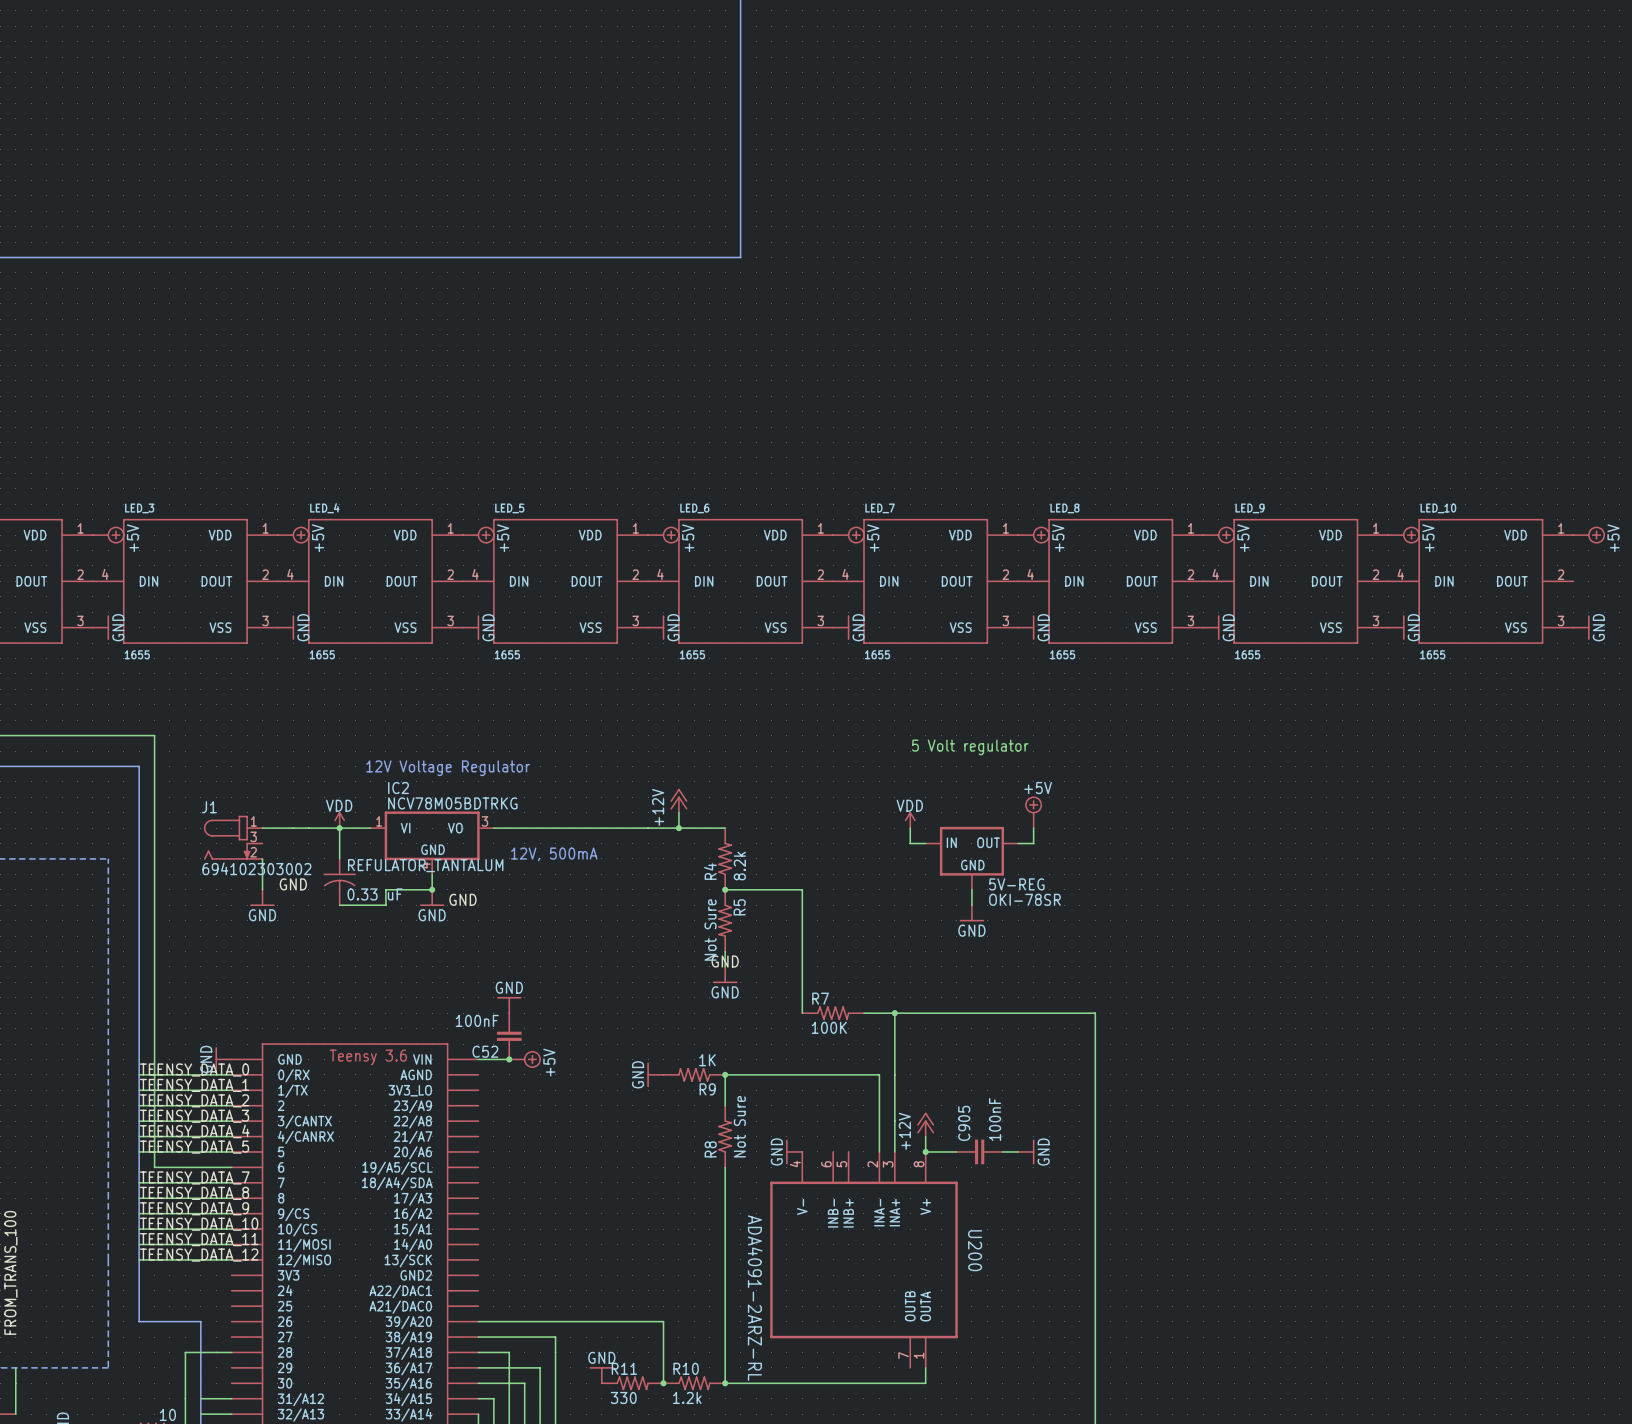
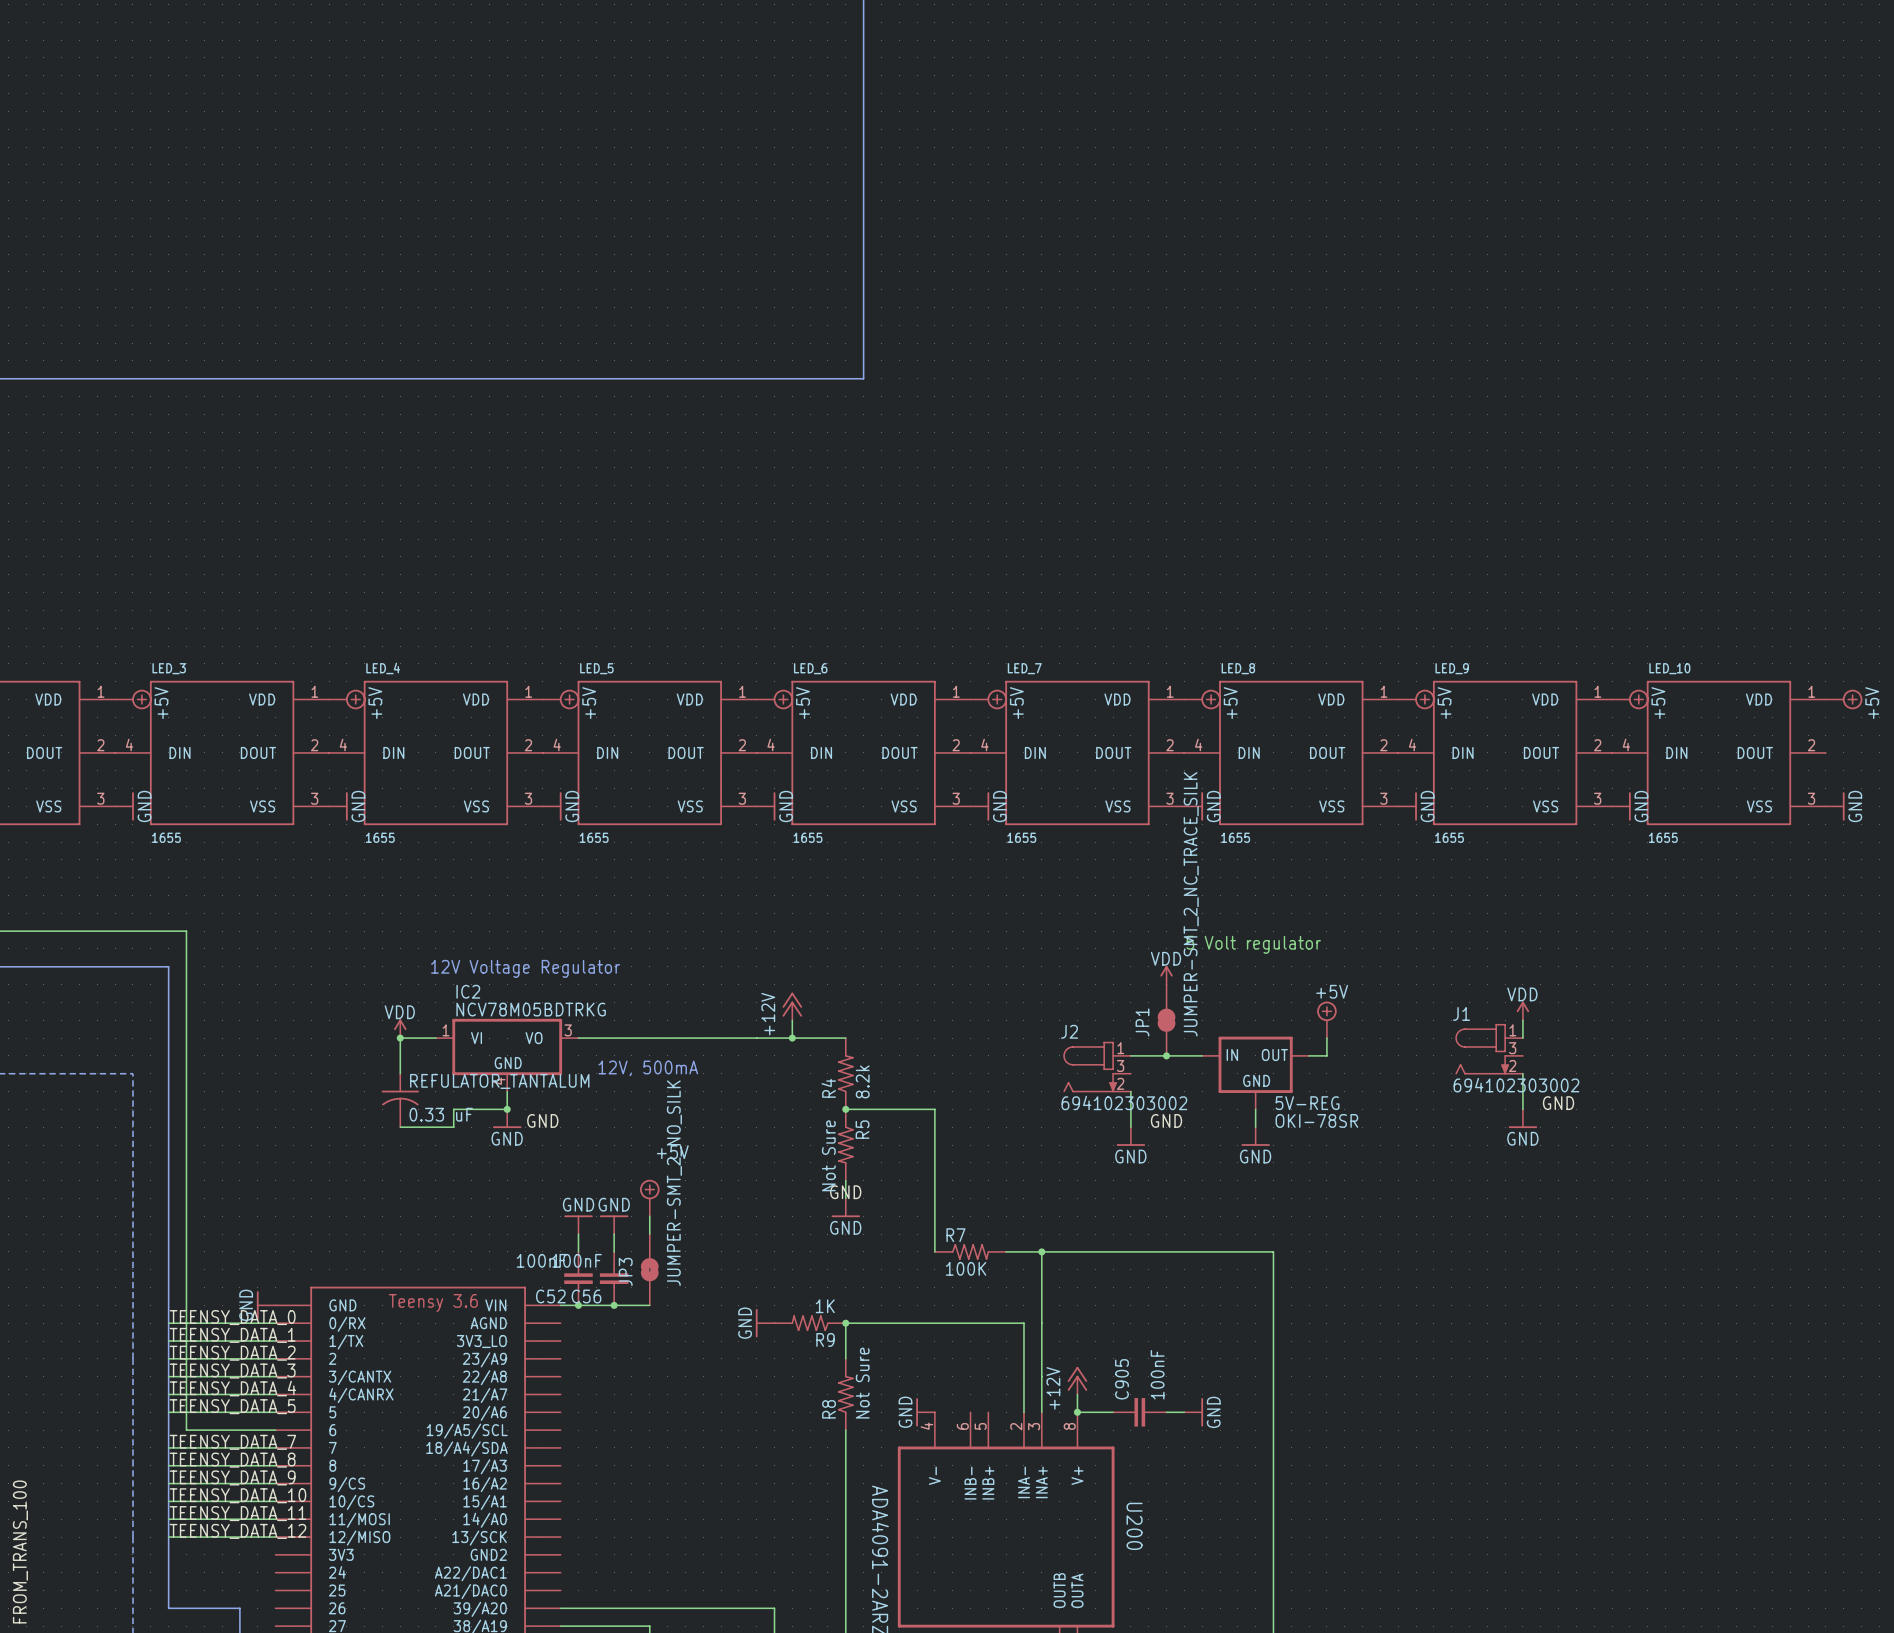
text position: 5 Volt regulator (970, 747) -> 5 Volt regulator (1253, 944)
power symbol: none -> VDD (1522, 1010)
JP1: none -> JUMPER-SMT_2_NC_TRACE_SILK (1166, 1020)
power symbol position: +5V (1033, 812) -> +5V (1326, 1019)
wire: none -> (1522, 1020) (1522, 1038)
power symbol position: VDD (910, 820) -> VDD (1166, 975)
wire: (262, 828) (339, 828) -> none
wire: (910, 828) (910, 843) (925, 843) -> none
wire: (1033, 828) (1033, 843) -> (1255, 1109) (1255, 1127)
wire: none -> (1326, 1038) (1326, 1055) (1309, 1055)
J1 position: (233, 837) -> (1489, 1049)
junction: none -> (1166, 1055)
J2: none -> 694102303002 (1097, 1067)
wire: (262, 858) (262, 889) -> none
5V-REG position: (971, 858) -> (1255, 1073)
wire: none -> (1522, 1073) (1522, 1109)
label: GND (293, 884) -> none
label: none -> GND (1558, 1103)
power symbol: GND (262, 897) -> none
power symbol: none -> GND (1522, 1118)
label: none -> GND (1166, 1120)
power symbol: none -> GND (1255, 1136)
wire: none -> (649, 1216) (649, 1234)
power symbol: none -> GND (578, 1224)
power symbol: none -> GND (614, 1224)
wire: none -> (578, 1234) (578, 1251)
wire: none -> (614, 1234) (614, 1251)
power symbol: GND (509, 1005) -> none
JP3: none -> JUMPER-SMT_2_NO_SILK (649, 1269)
C52 position: (509, 1036) -> (578, 1278)
C56: none -> 100nF (614, 1278)
junction: none -> (578, 1305)
junction: (509, 1059) -> none
junction: none -> (614, 1305)
power symbol position: +5V (525, 1059) -> +5V (649, 1198)
power symbol rotation: 0° (532, 1059) -> 90° counterclockwise (649, 1189)
power symbol text position: +5V (549, 1062) -> +5V (672, 1152)

